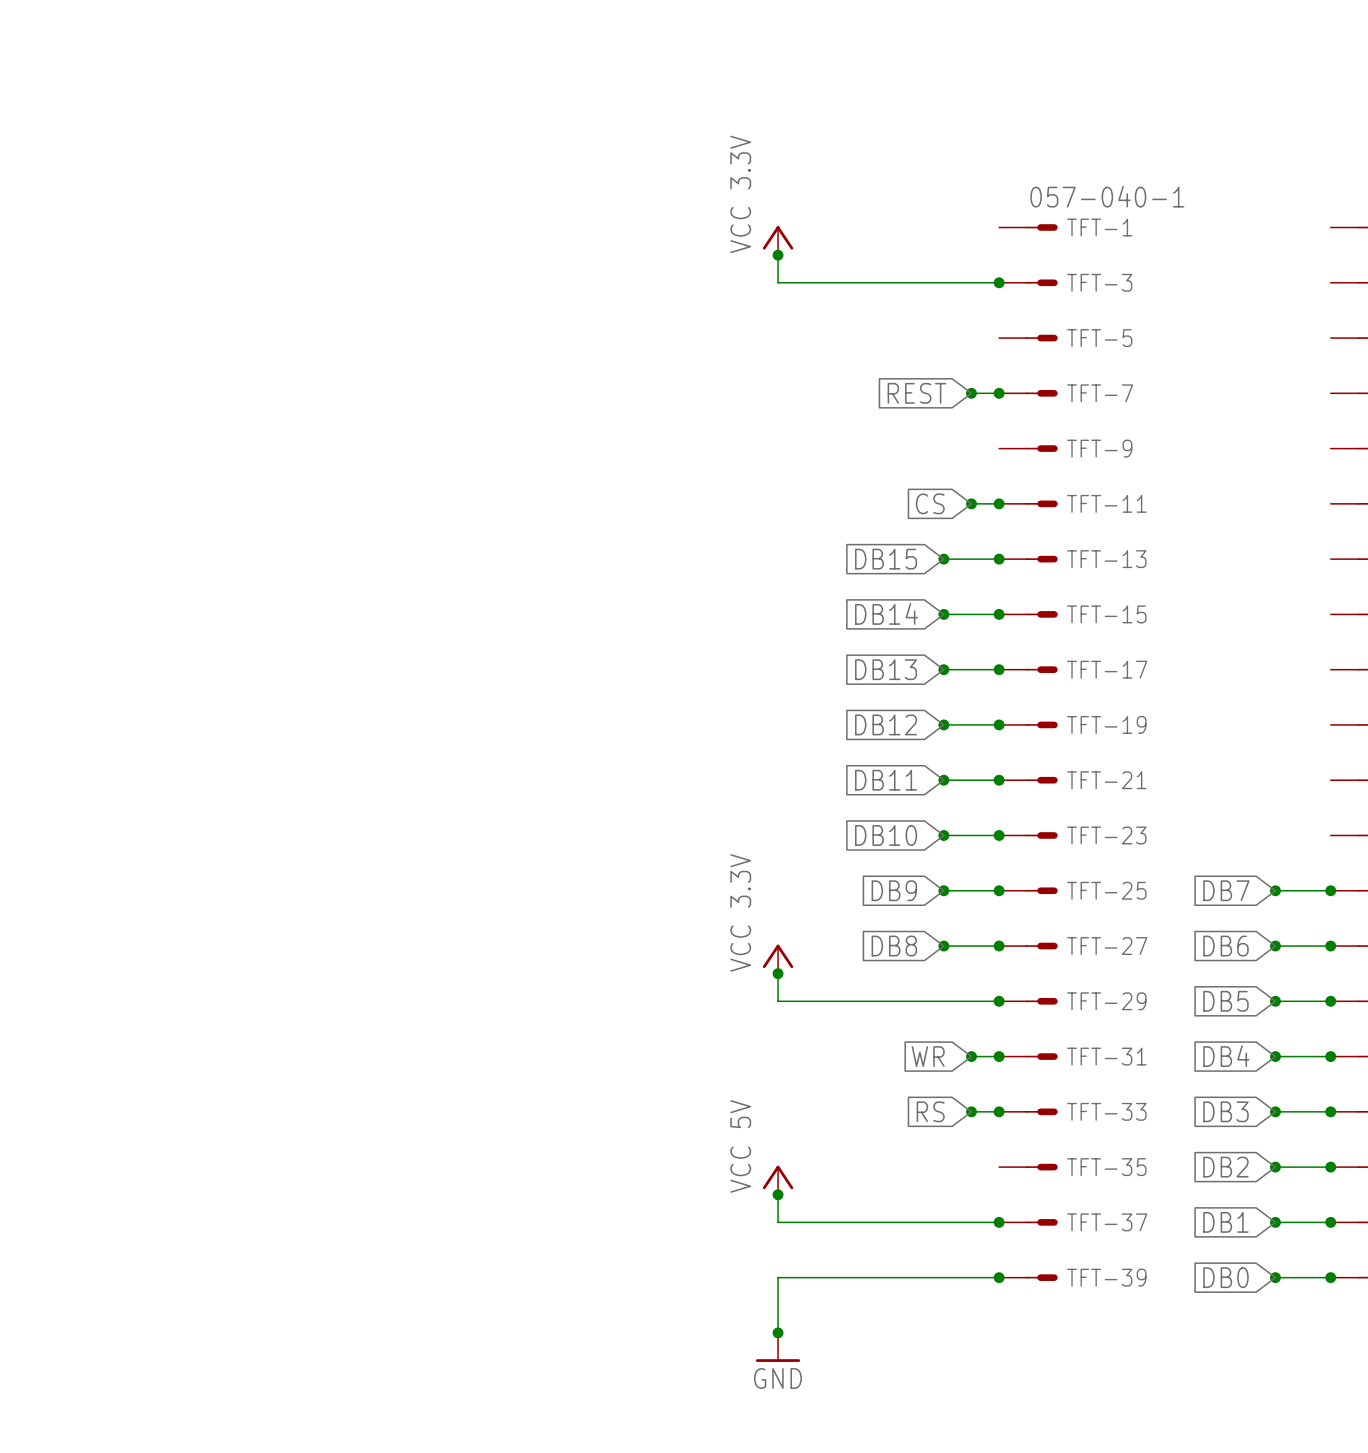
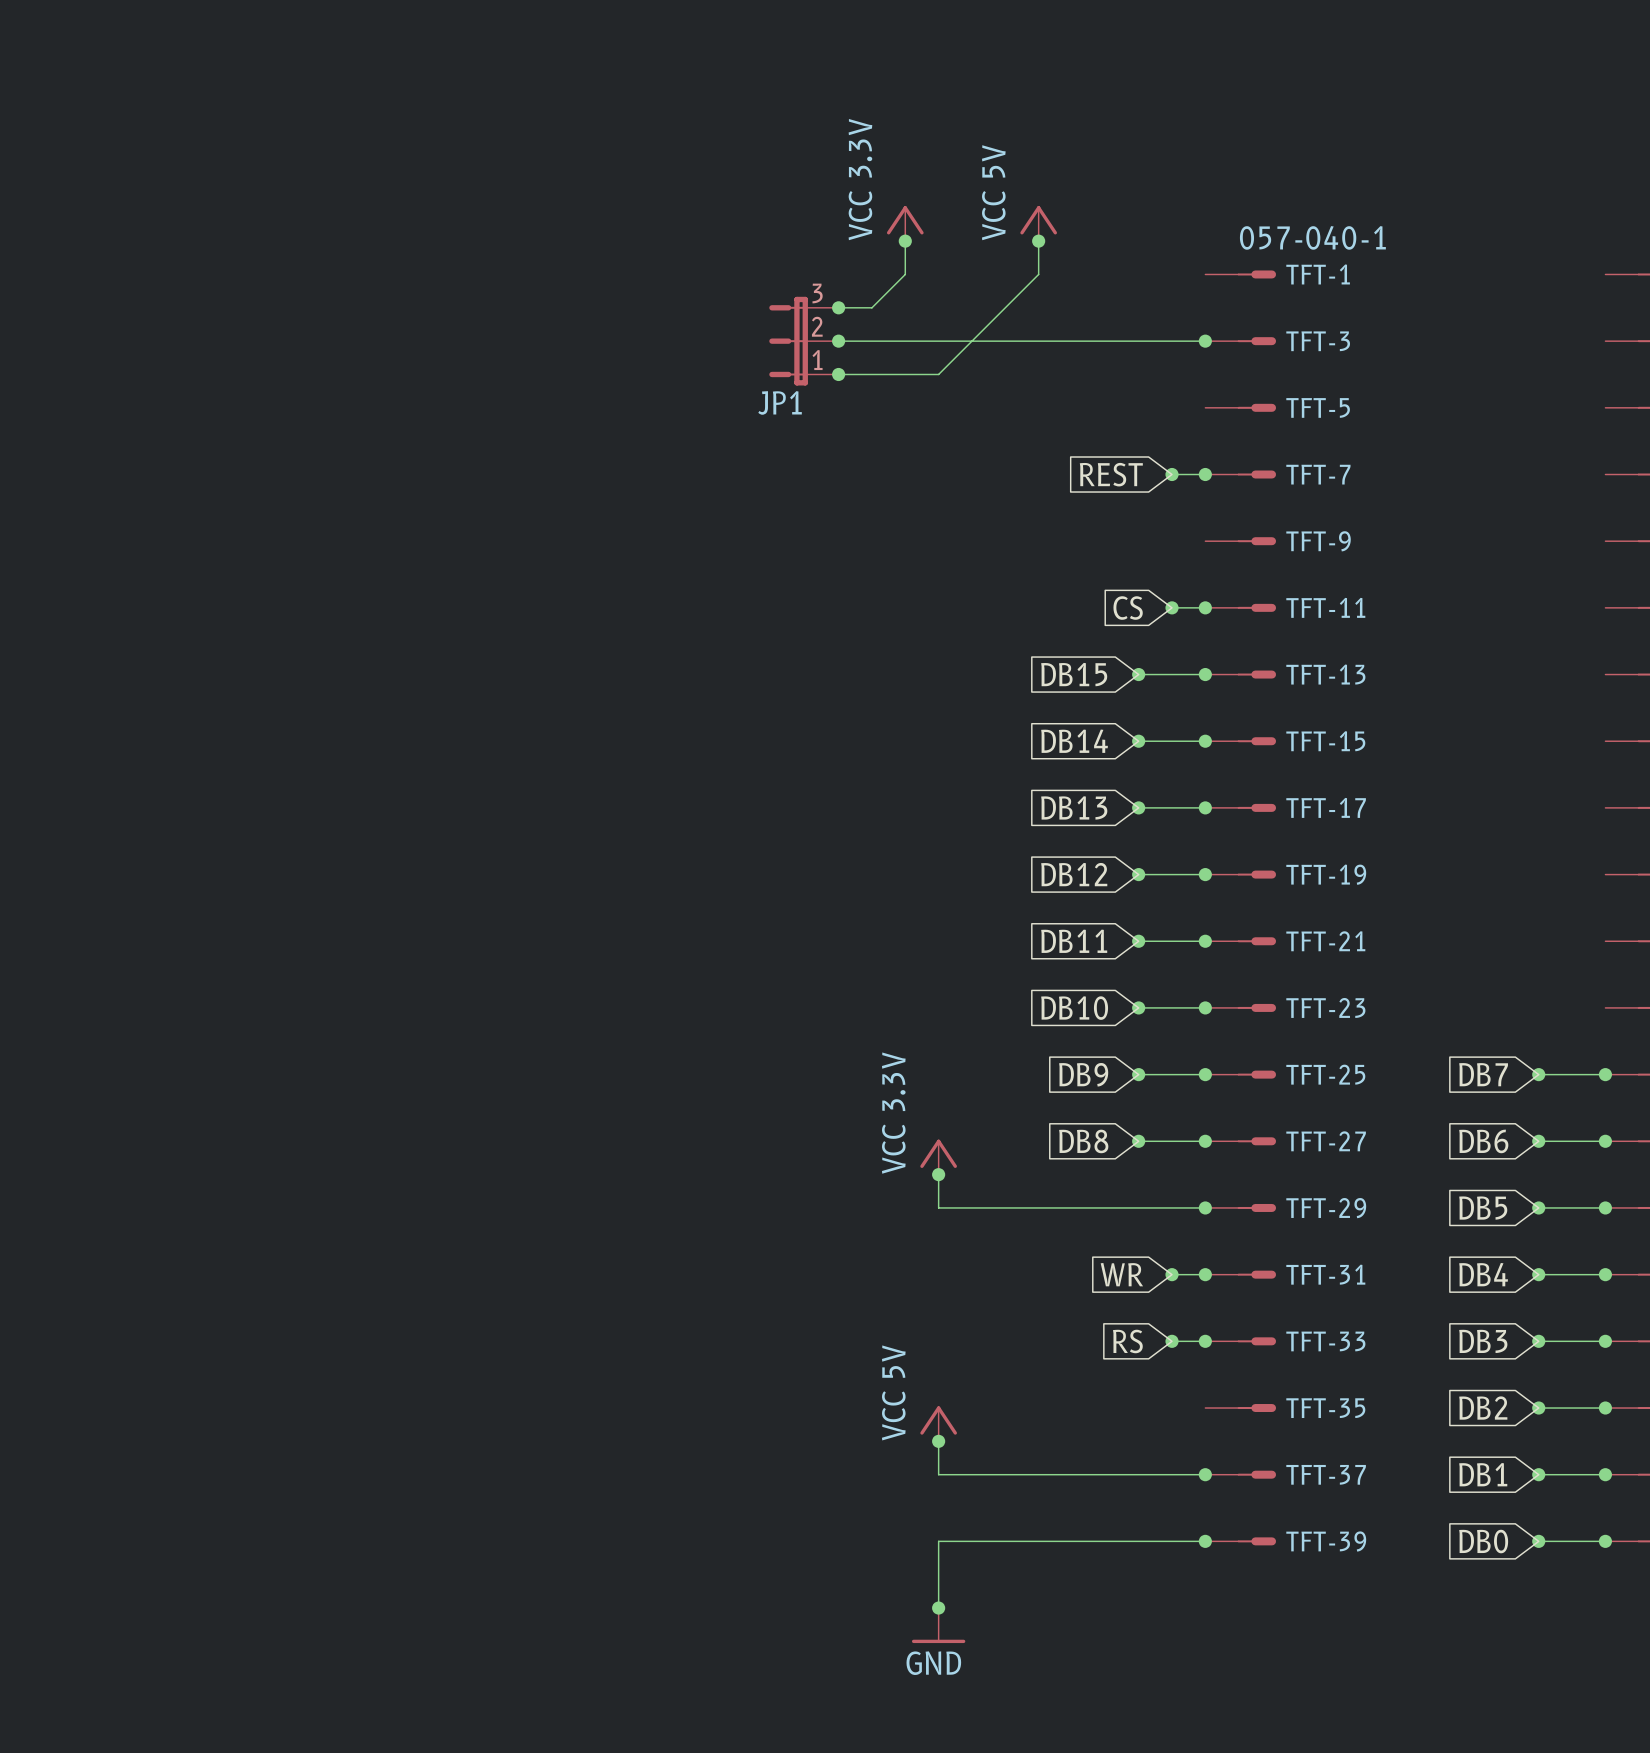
power symbol: none -> VCC 5V (1038, 223)
wire: none -> (905, 241) (905, 274) (871, 307) (838, 307)
junction: none -> (905, 241)
wire: none -> (1038, 241) (1038, 274) (938, 374) (838, 374)
junction: none -> (1038, 241)
power symbol position: VCC 3.3V (778, 240) -> VCC 3.3V (905, 223)
junction: none -> (838, 307)
wire: (778, 255) (778, 282) -> (838, 341) (938, 341)
junction: (778, 255) -> none
JP1: none -> (803, 341)
junction: none -> (838, 341)
junction: none -> (838, 374)

